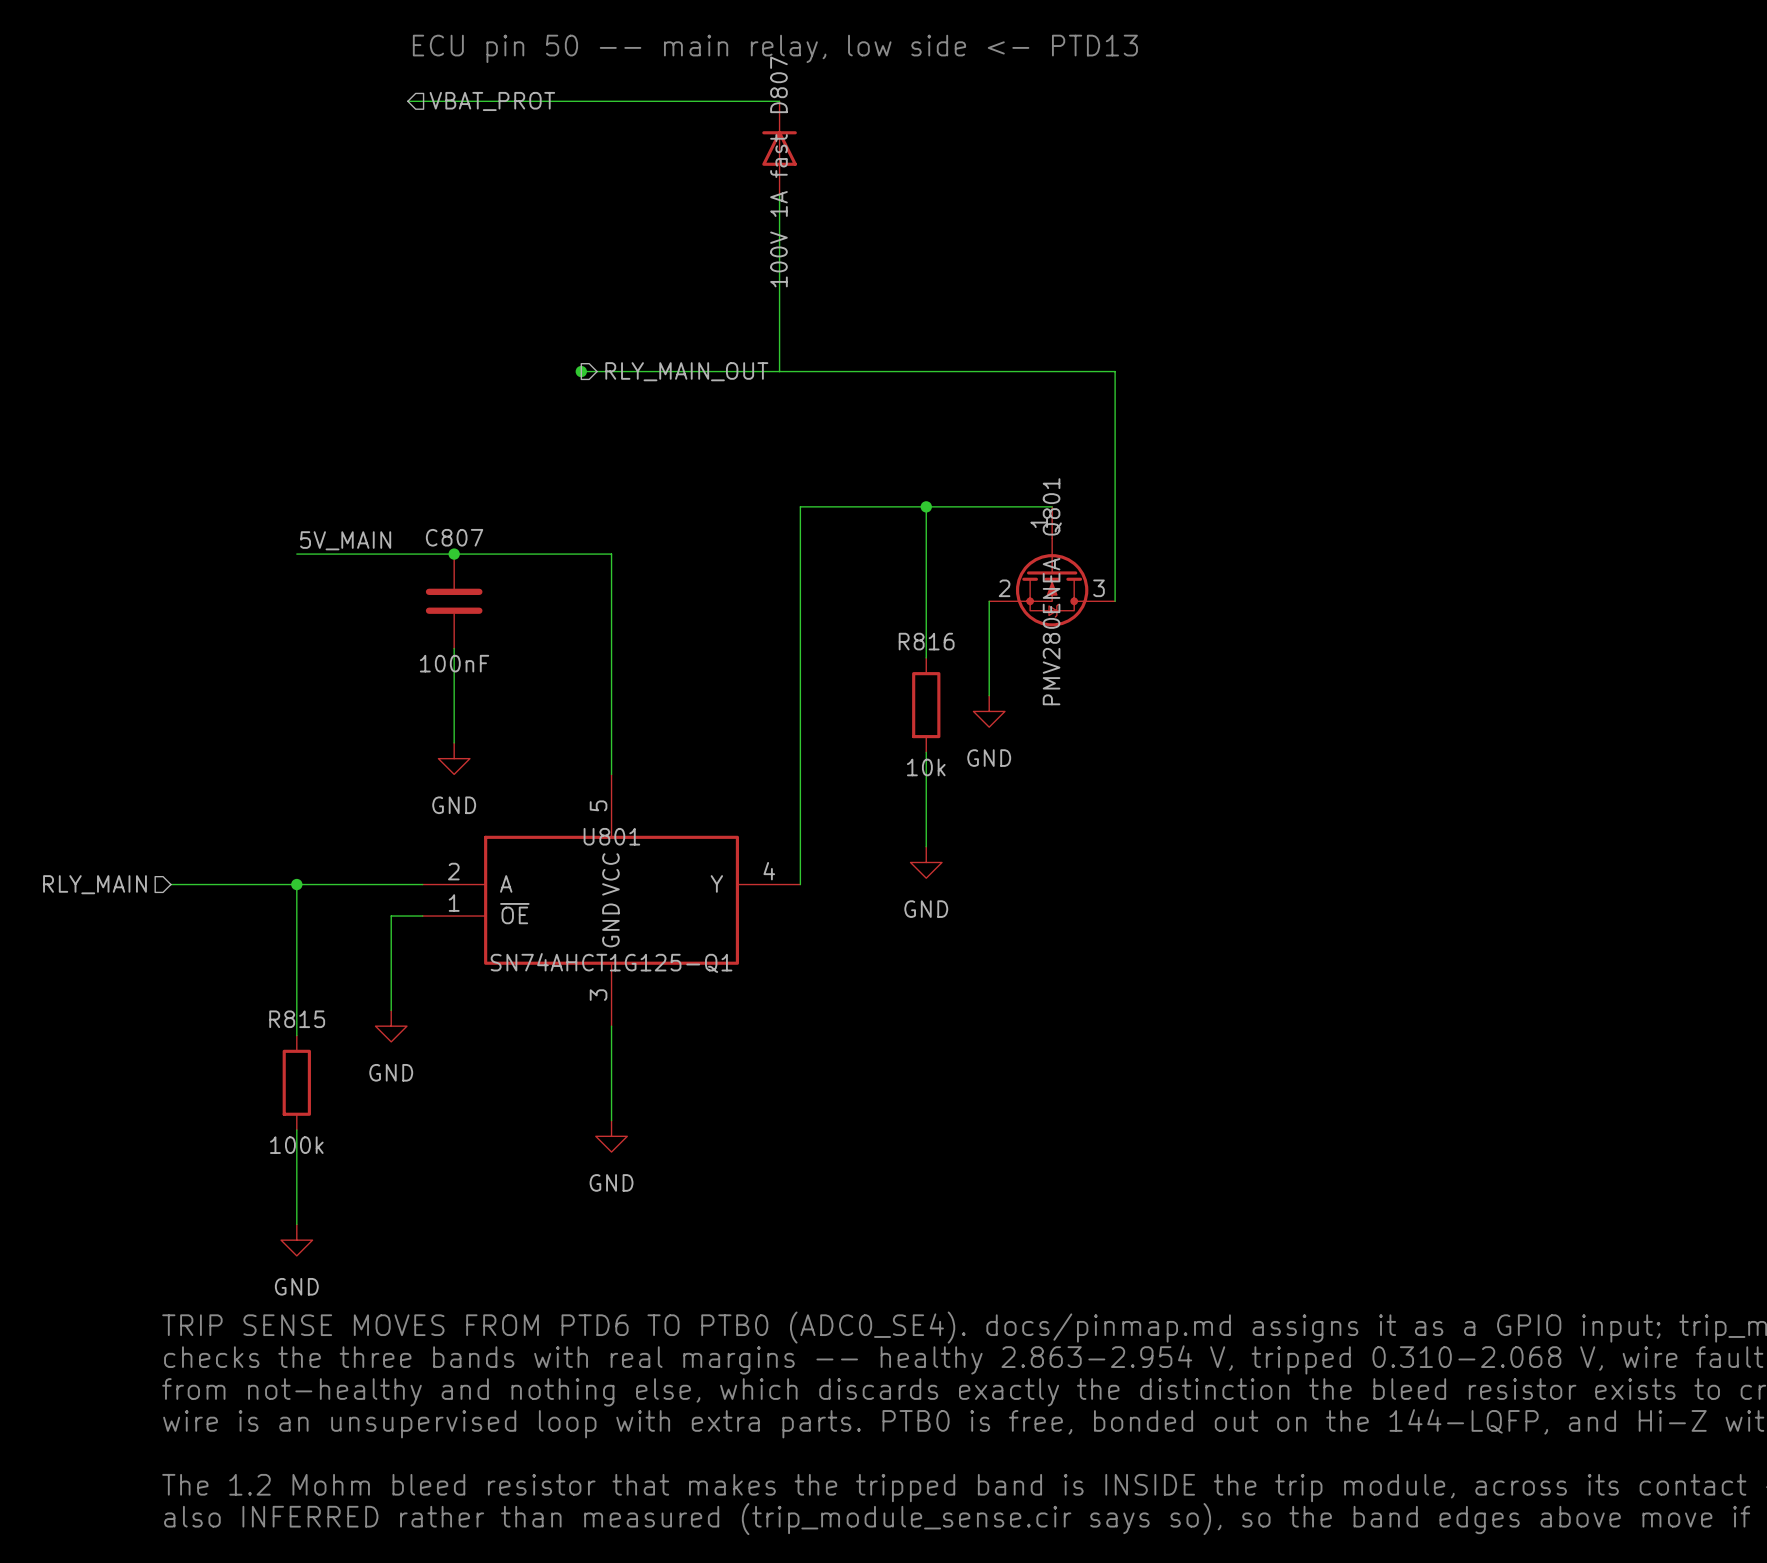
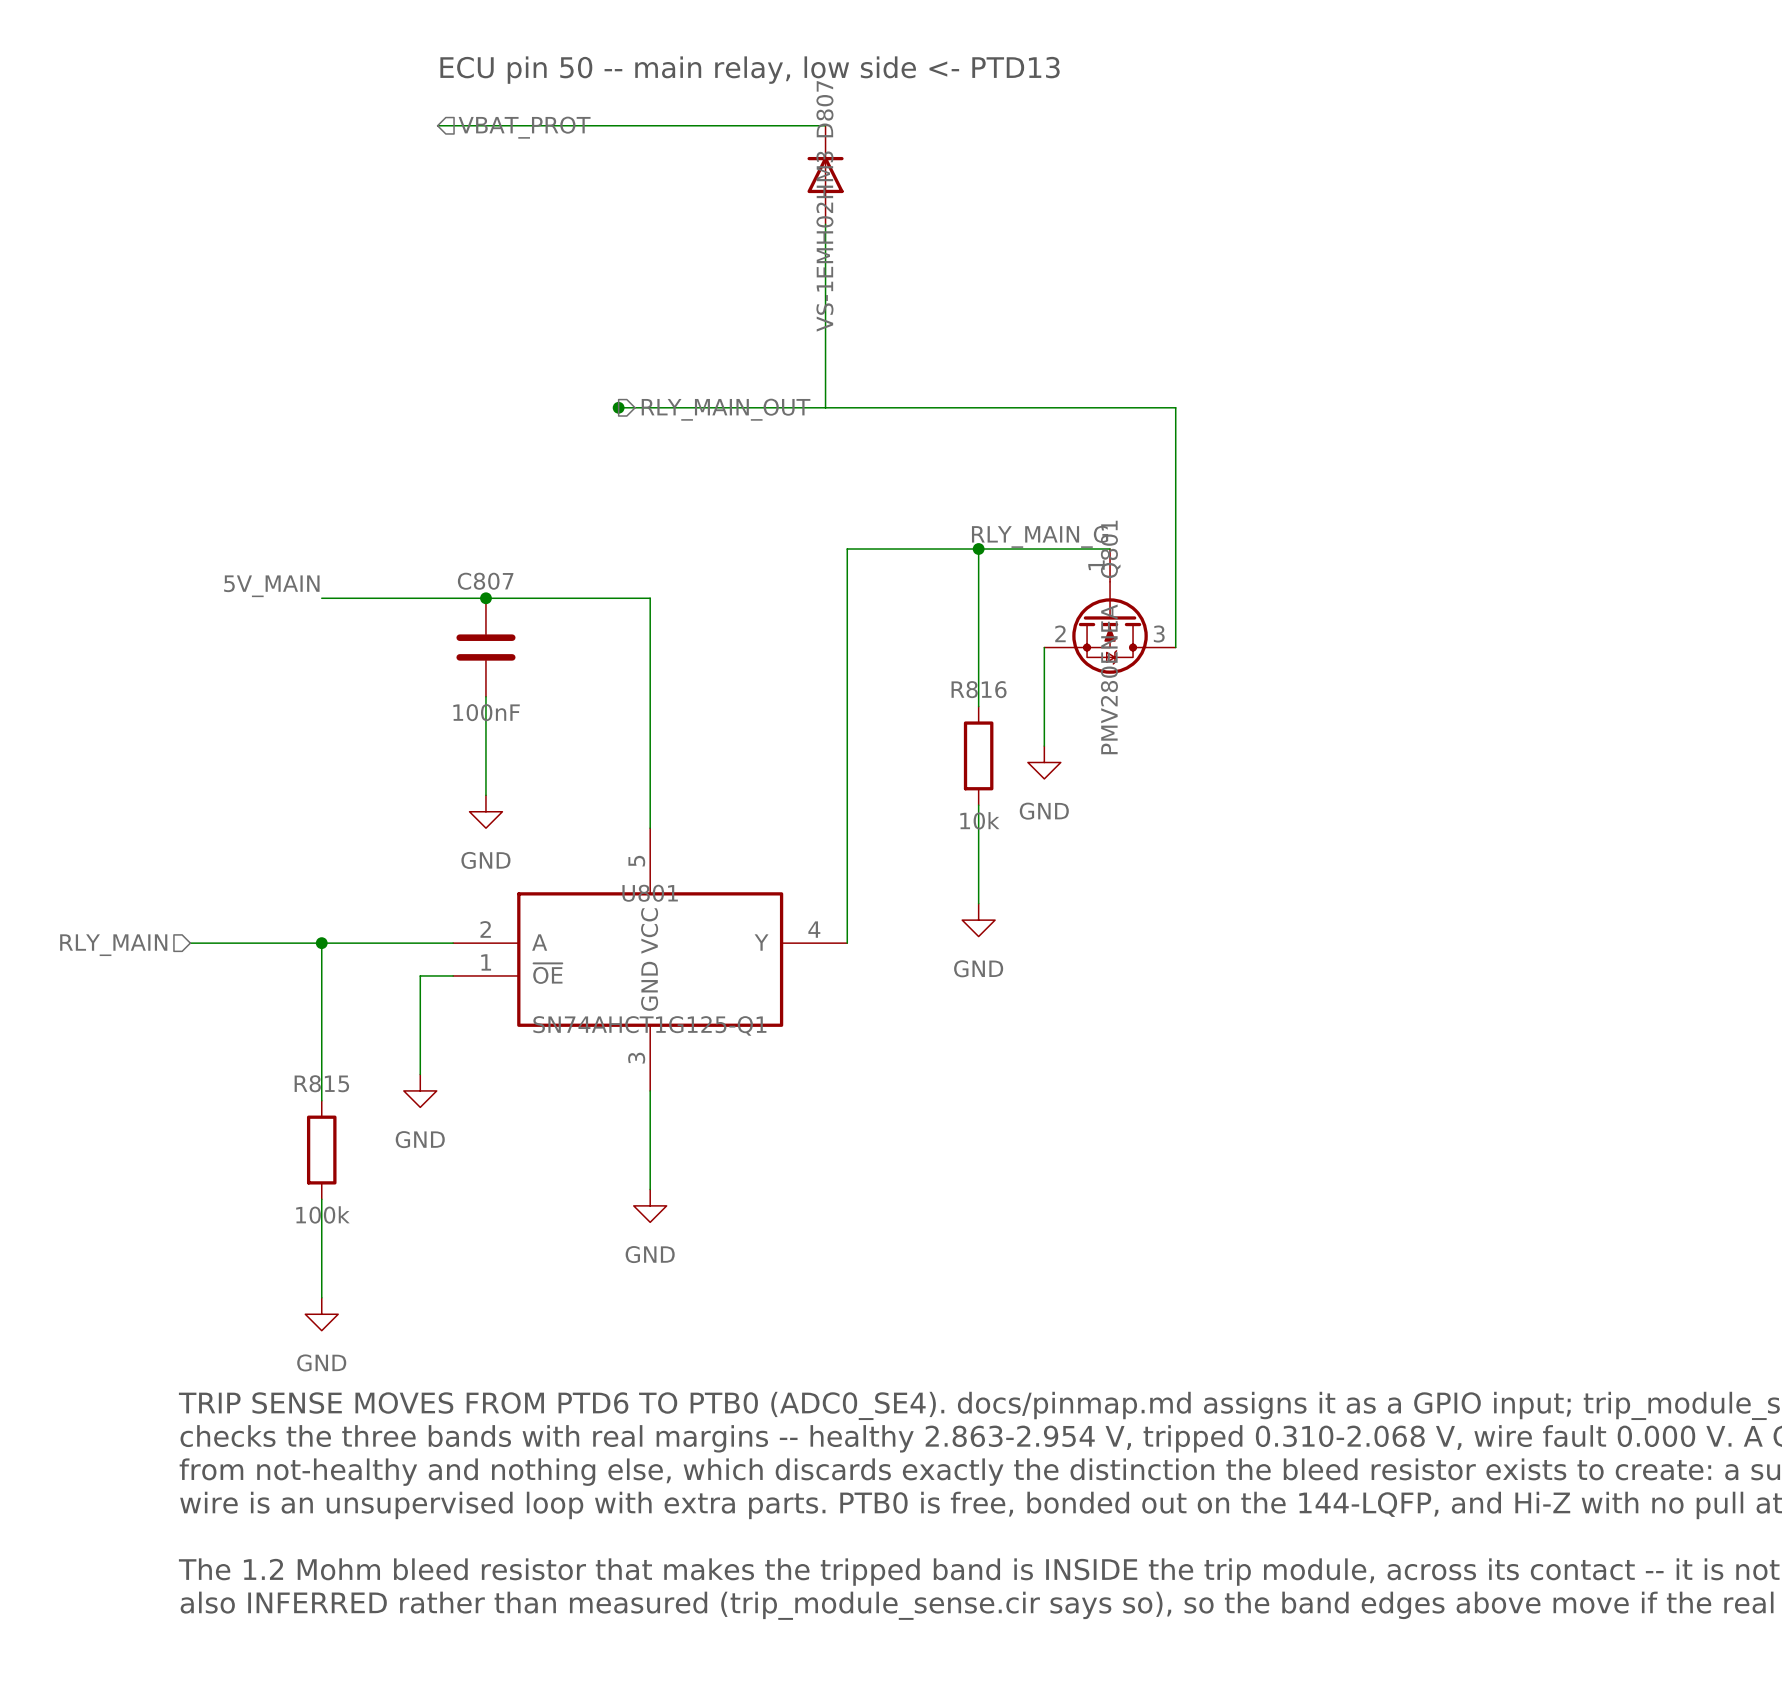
D807 value: 100V 1A fast (778, 210) -> VS-1EMH02HM3 (824, 241)
label: none -> RLY_MAIN_G (1040, 536)
label position: 5V_MAIN (345, 540) -> 5V_MAIN (271, 586)

